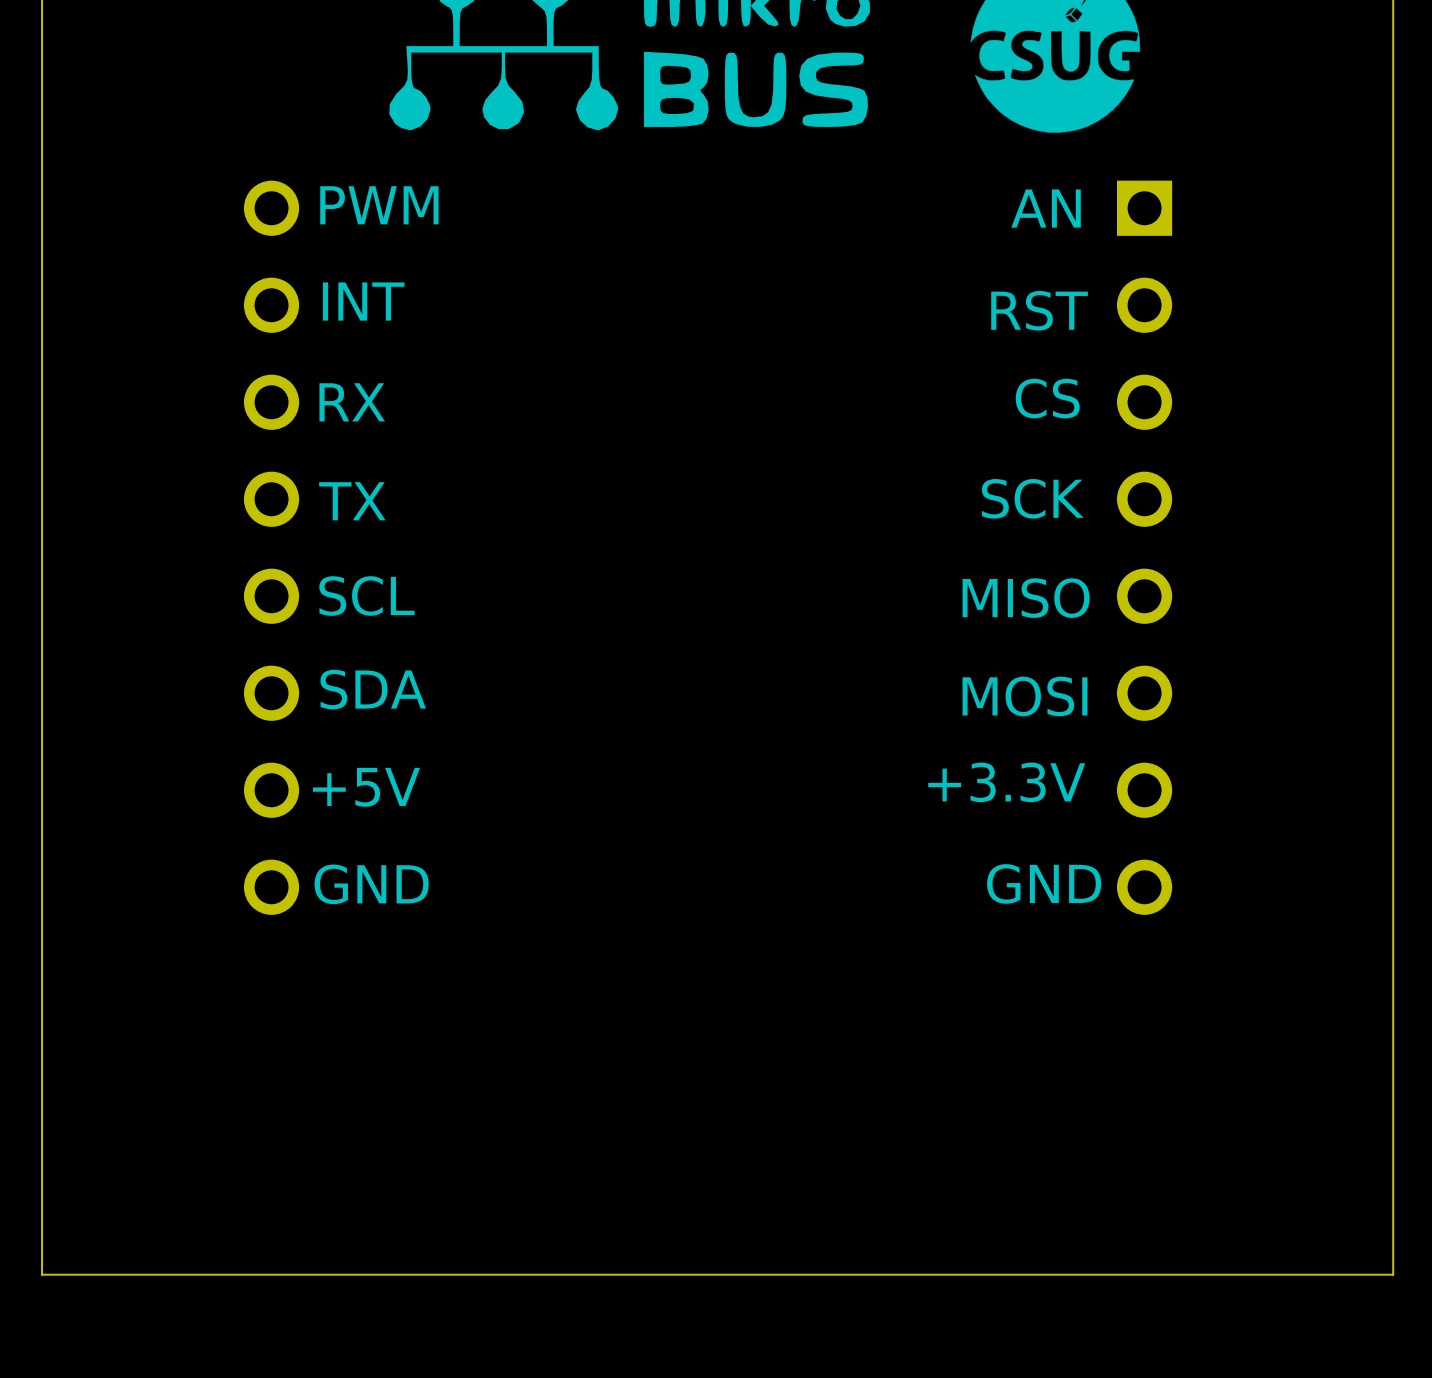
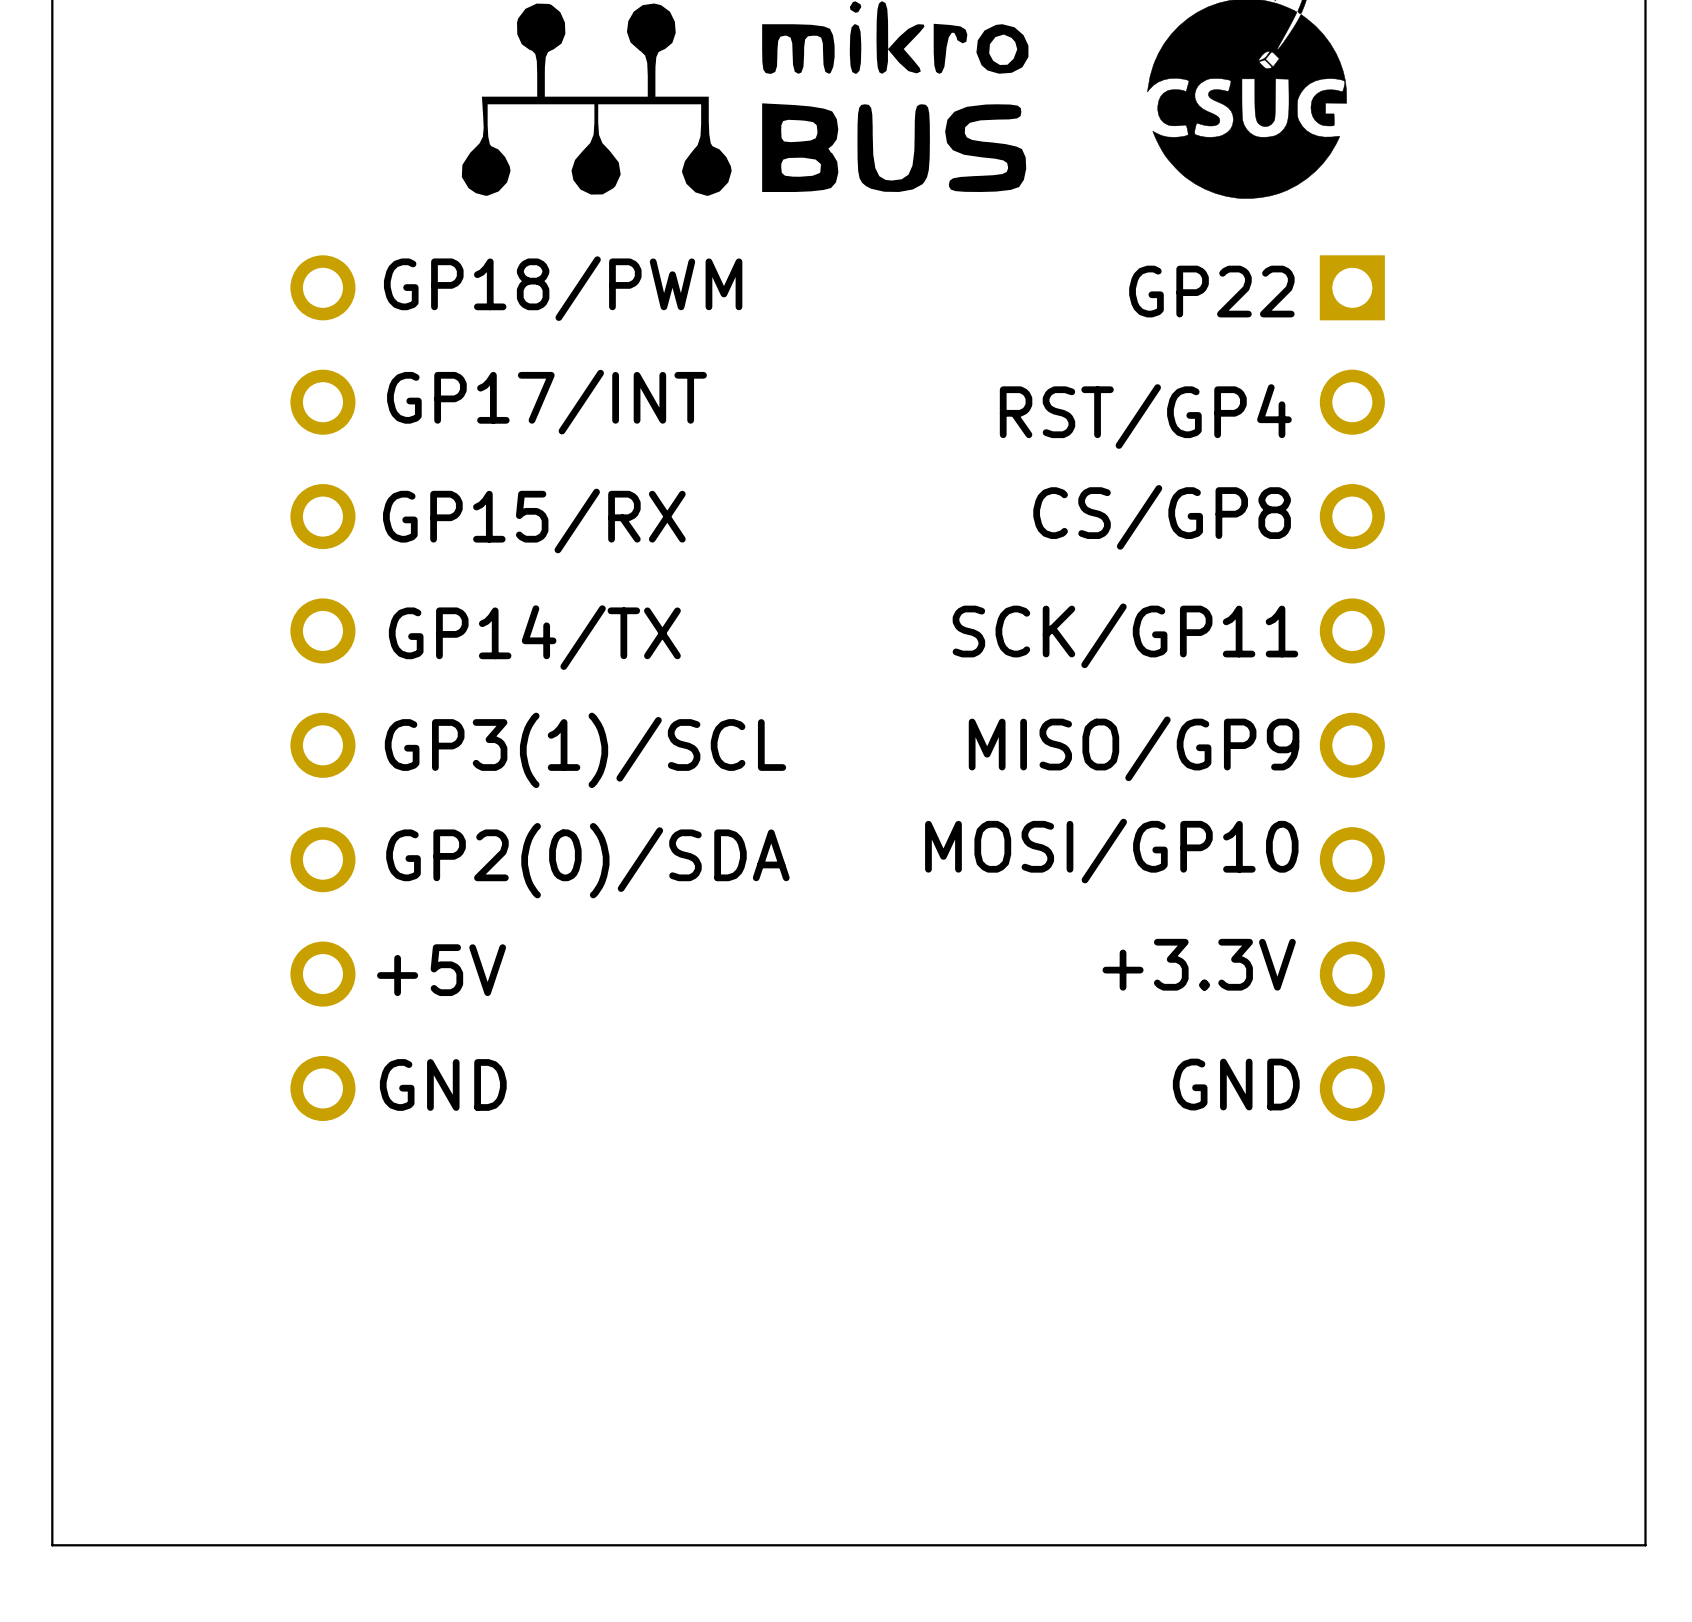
text: PWM (379, 205) -> GP18/PWM (563, 288)
text: AN (1046, 208) -> none
text: none -> GP22 (1211, 291)
text: INT (363, 301) -> GP17/INT (546, 402)
text: RST (1039, 310) -> none
text: none -> RST/GP4 (1145, 416)
text: CS (1047, 398) -> none
text: none -> CS/GP8 (1162, 517)
text: RX (352, 402) -> GP15/RX (534, 520)
text: SCK (1032, 498) -> none
text: TX (352, 501) -> GP14/TX (534, 637)
text: none -> SCK/GP11 (1125, 635)
text: SCL (366, 596) -> GP3(1)/SCL (585, 750)
text: MISO (1026, 598) -> MISO/GP9 (1134, 748)
text: SDA (373, 689) -> GP2(0)/SDA (587, 860)
text: MOSI (1025, 696) -> MOSI/GP10 (1111, 851)

